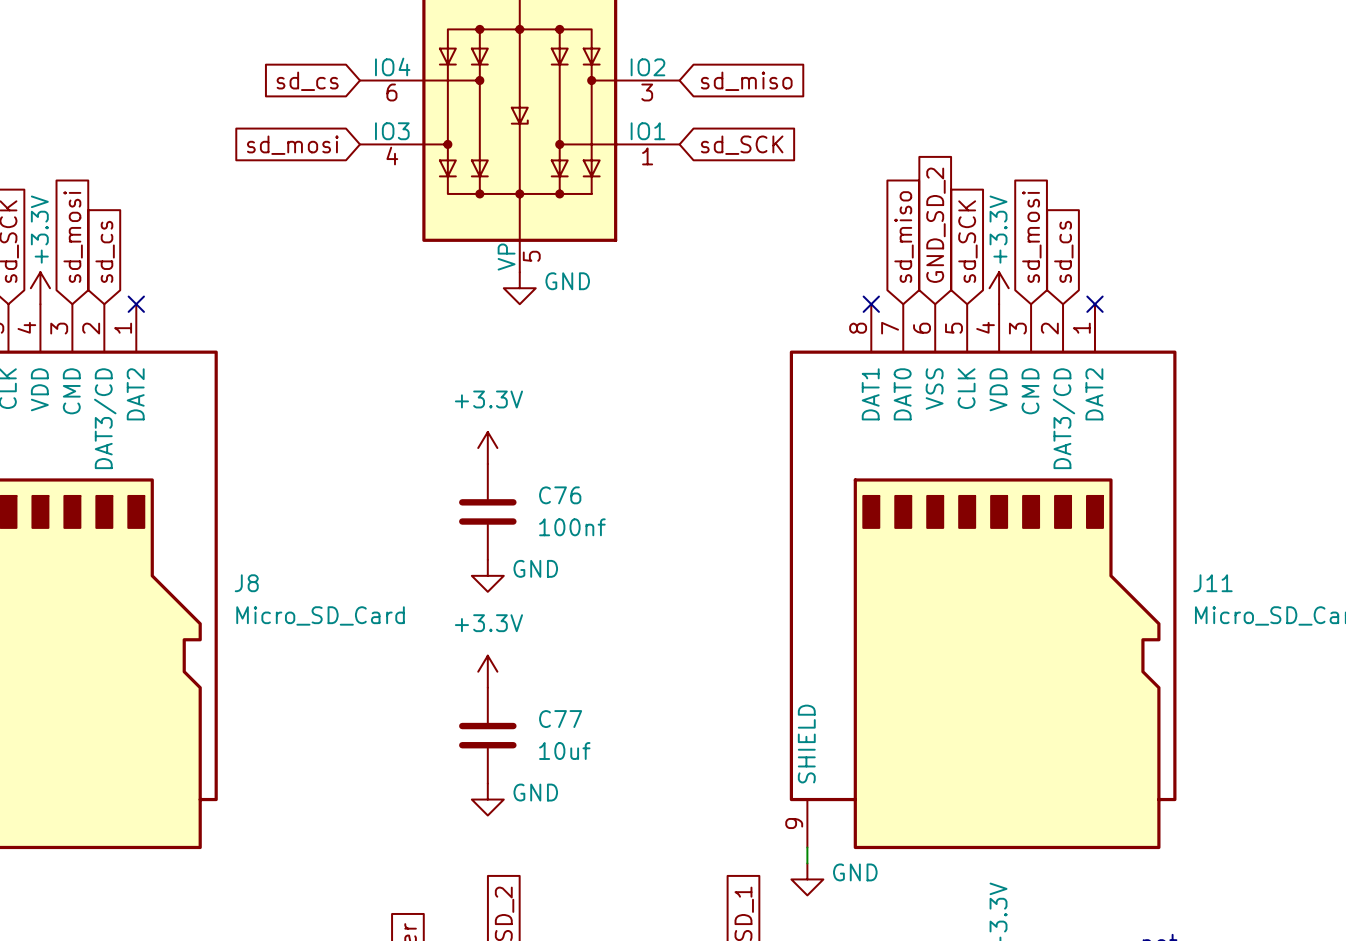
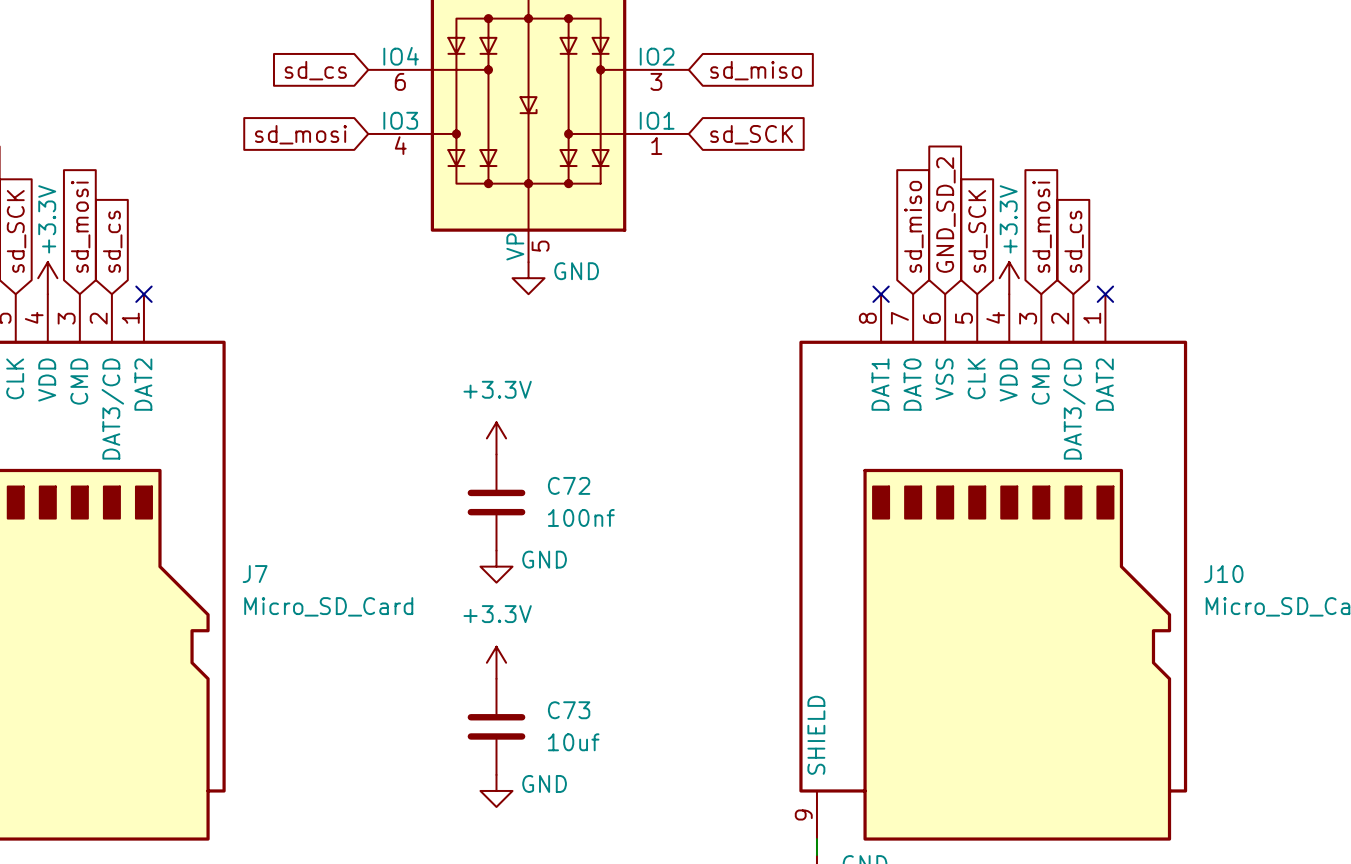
C76 name: C76 (560, 495) -> C72 (569, 485)
J8 name: J8 (246, 583) -> J7 (255, 574)
J11 name: J11 (1213, 583) -> J10 (1223, 574)
C77 name: C77 (560, 719) -> C73 (569, 710)

